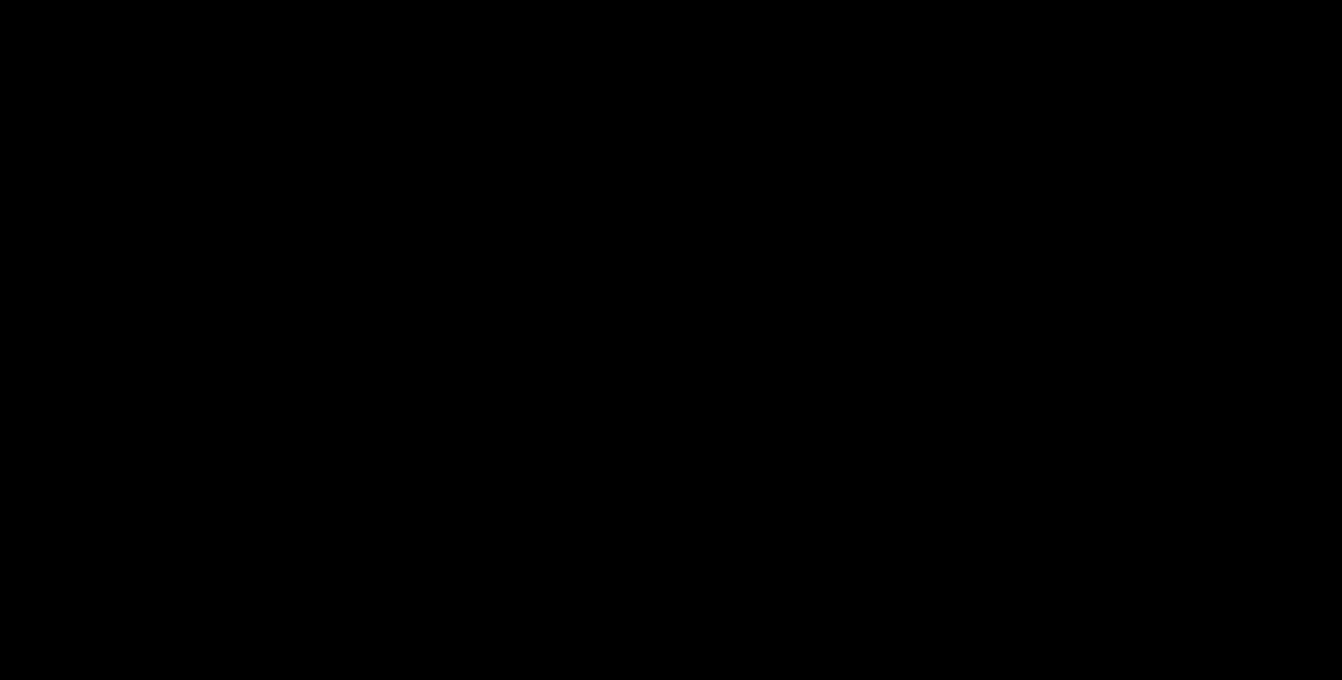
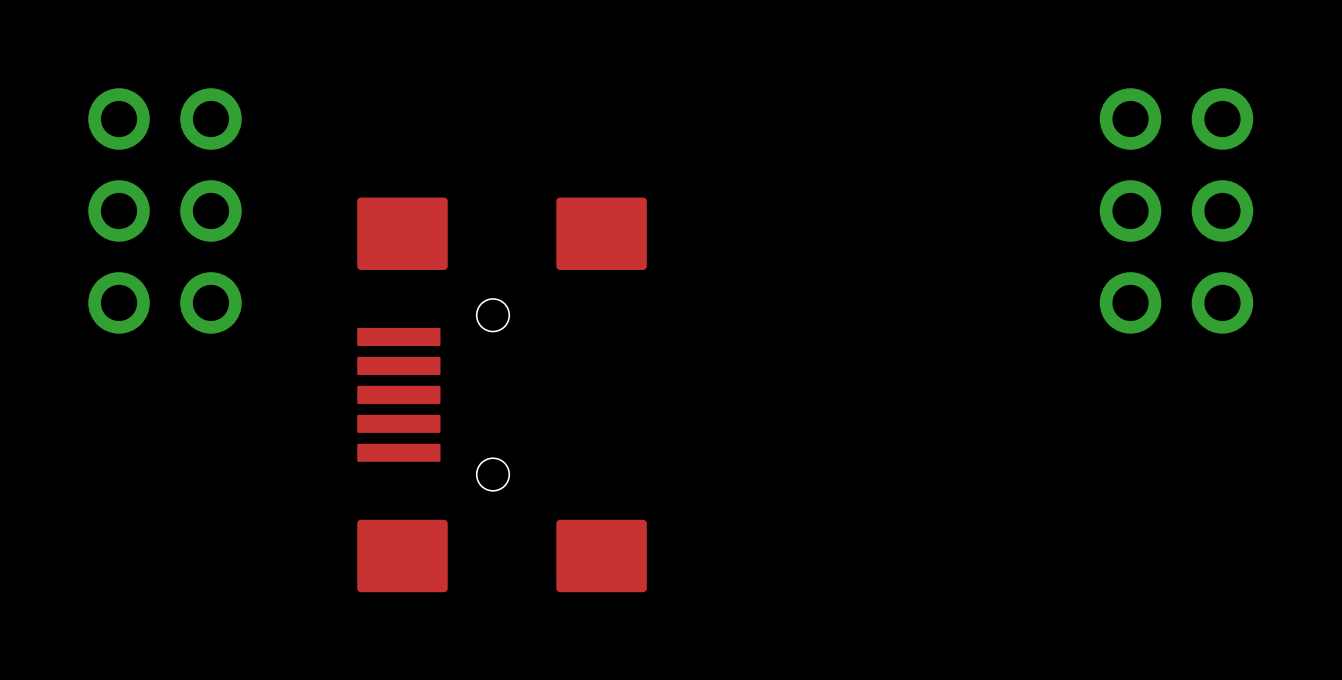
part: none -> (164, 210)
part: none -> (1176, 210)
part: none -> (502, 394)

